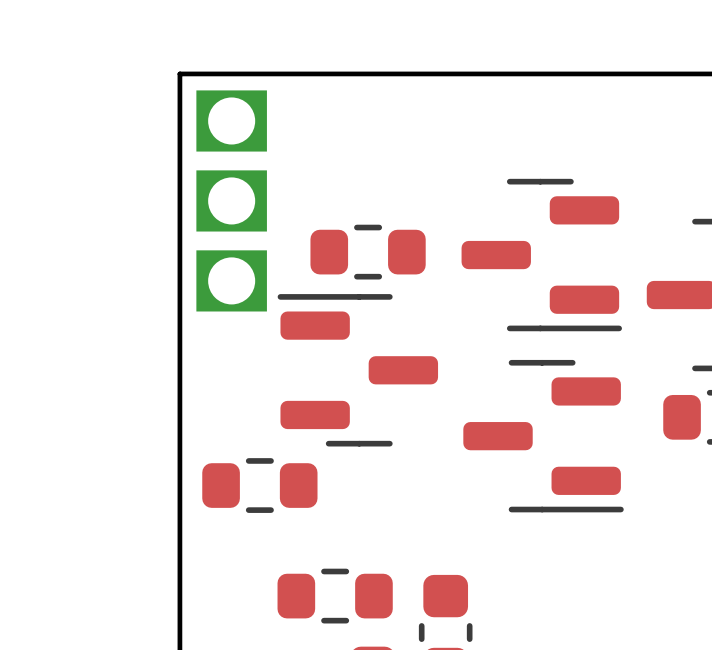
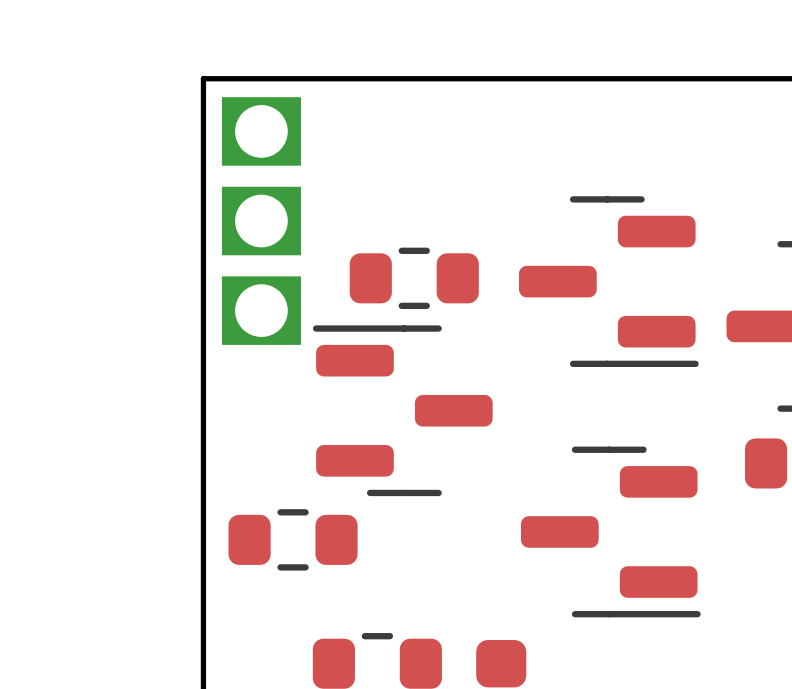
part position: (543, 436) -> (610, 531)

